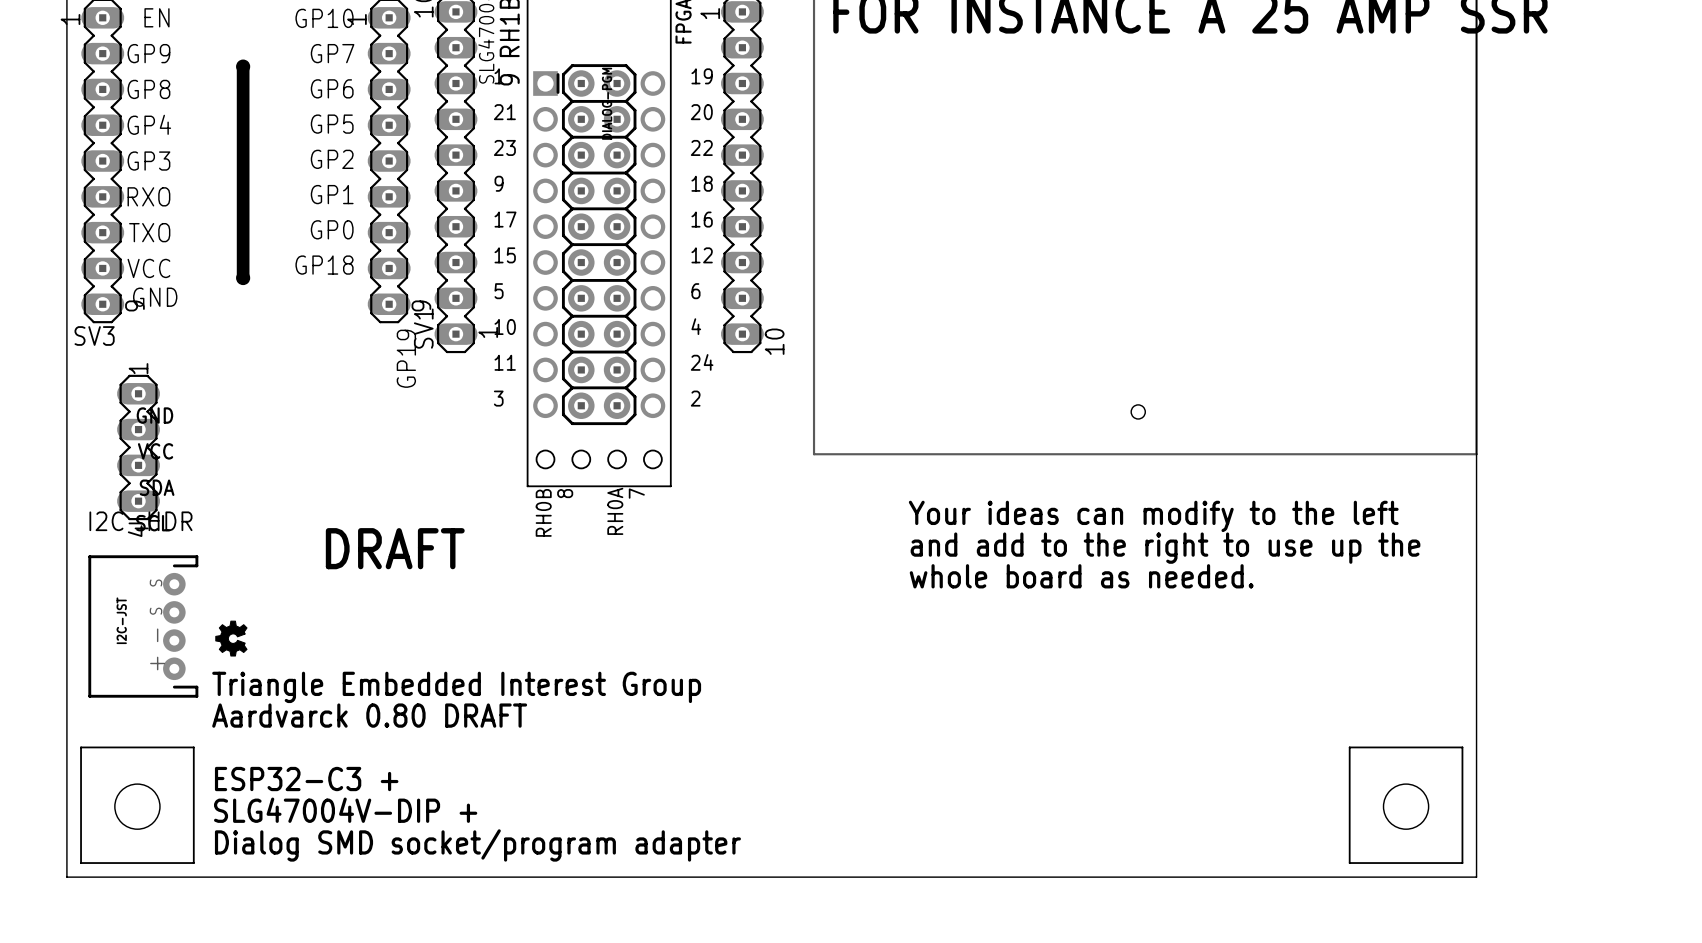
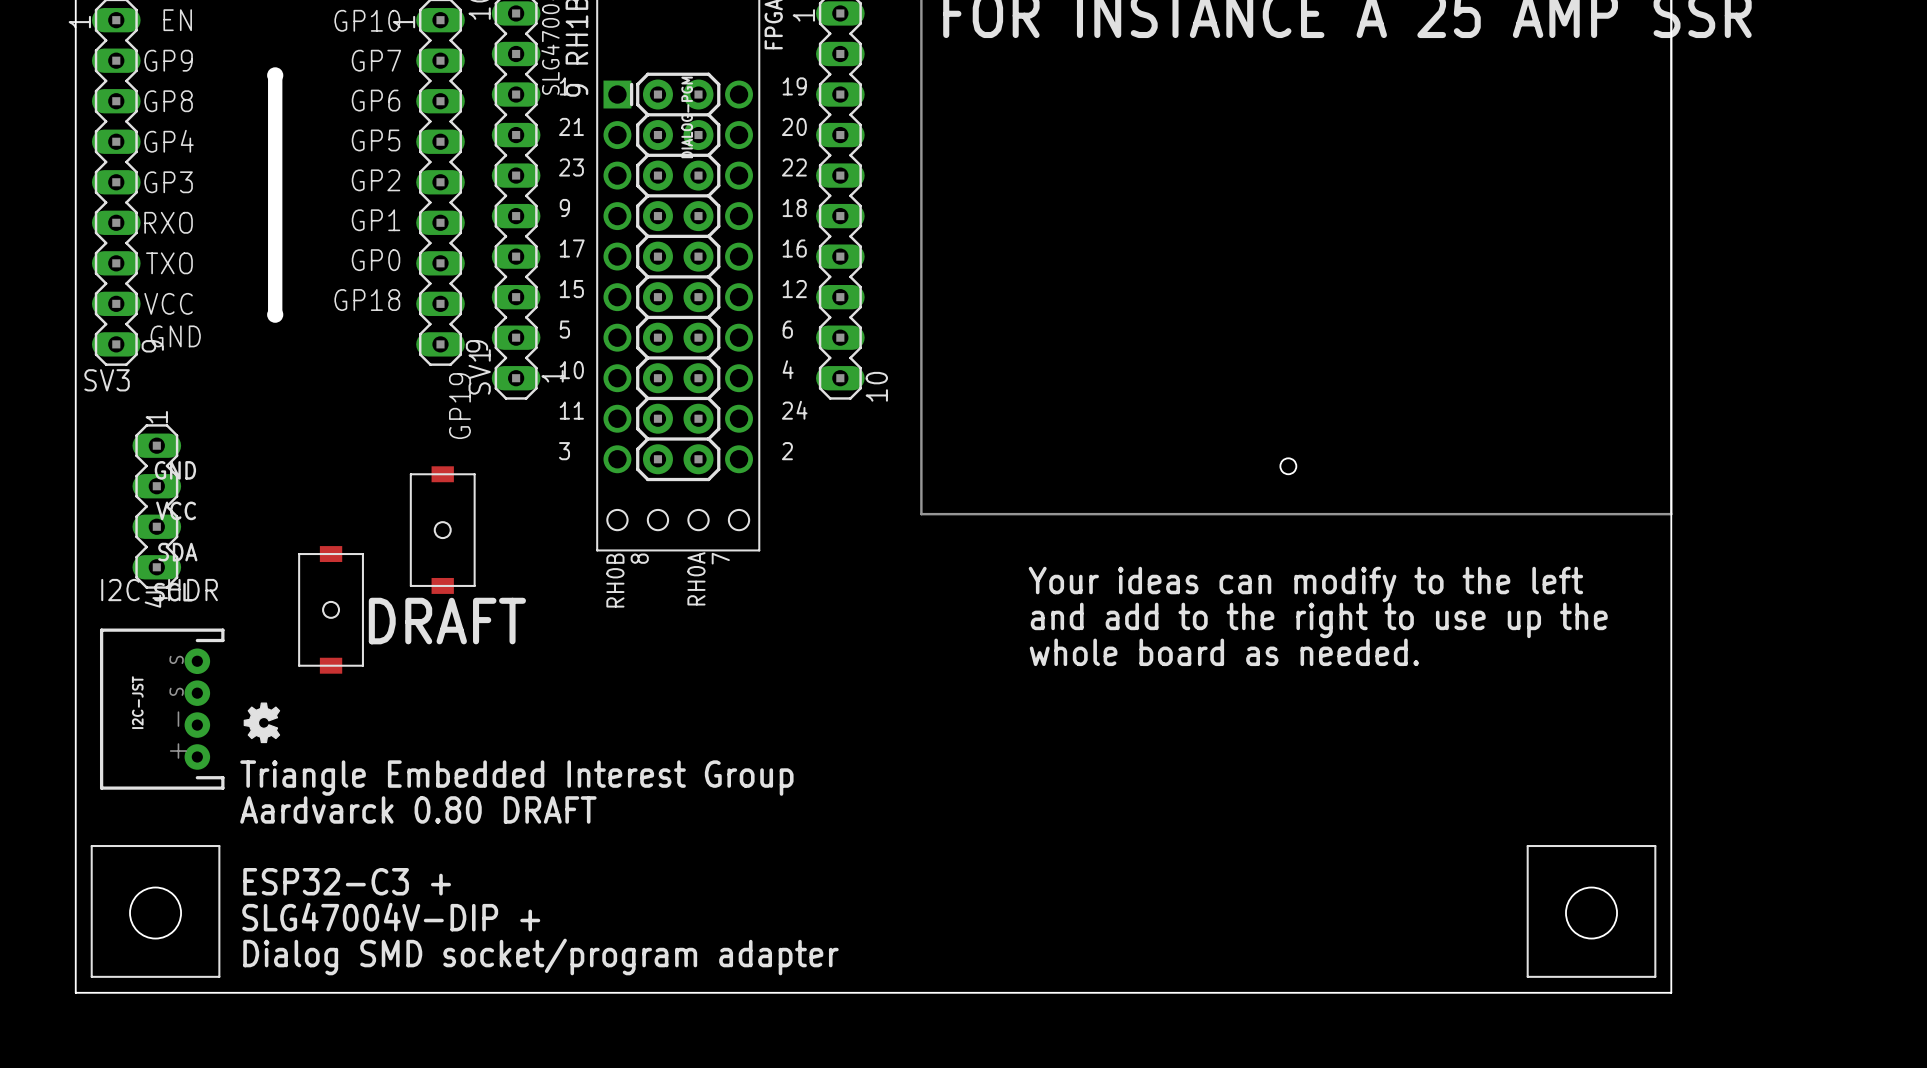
part: none -> (442, 530)
part: none -> (331, 609)

